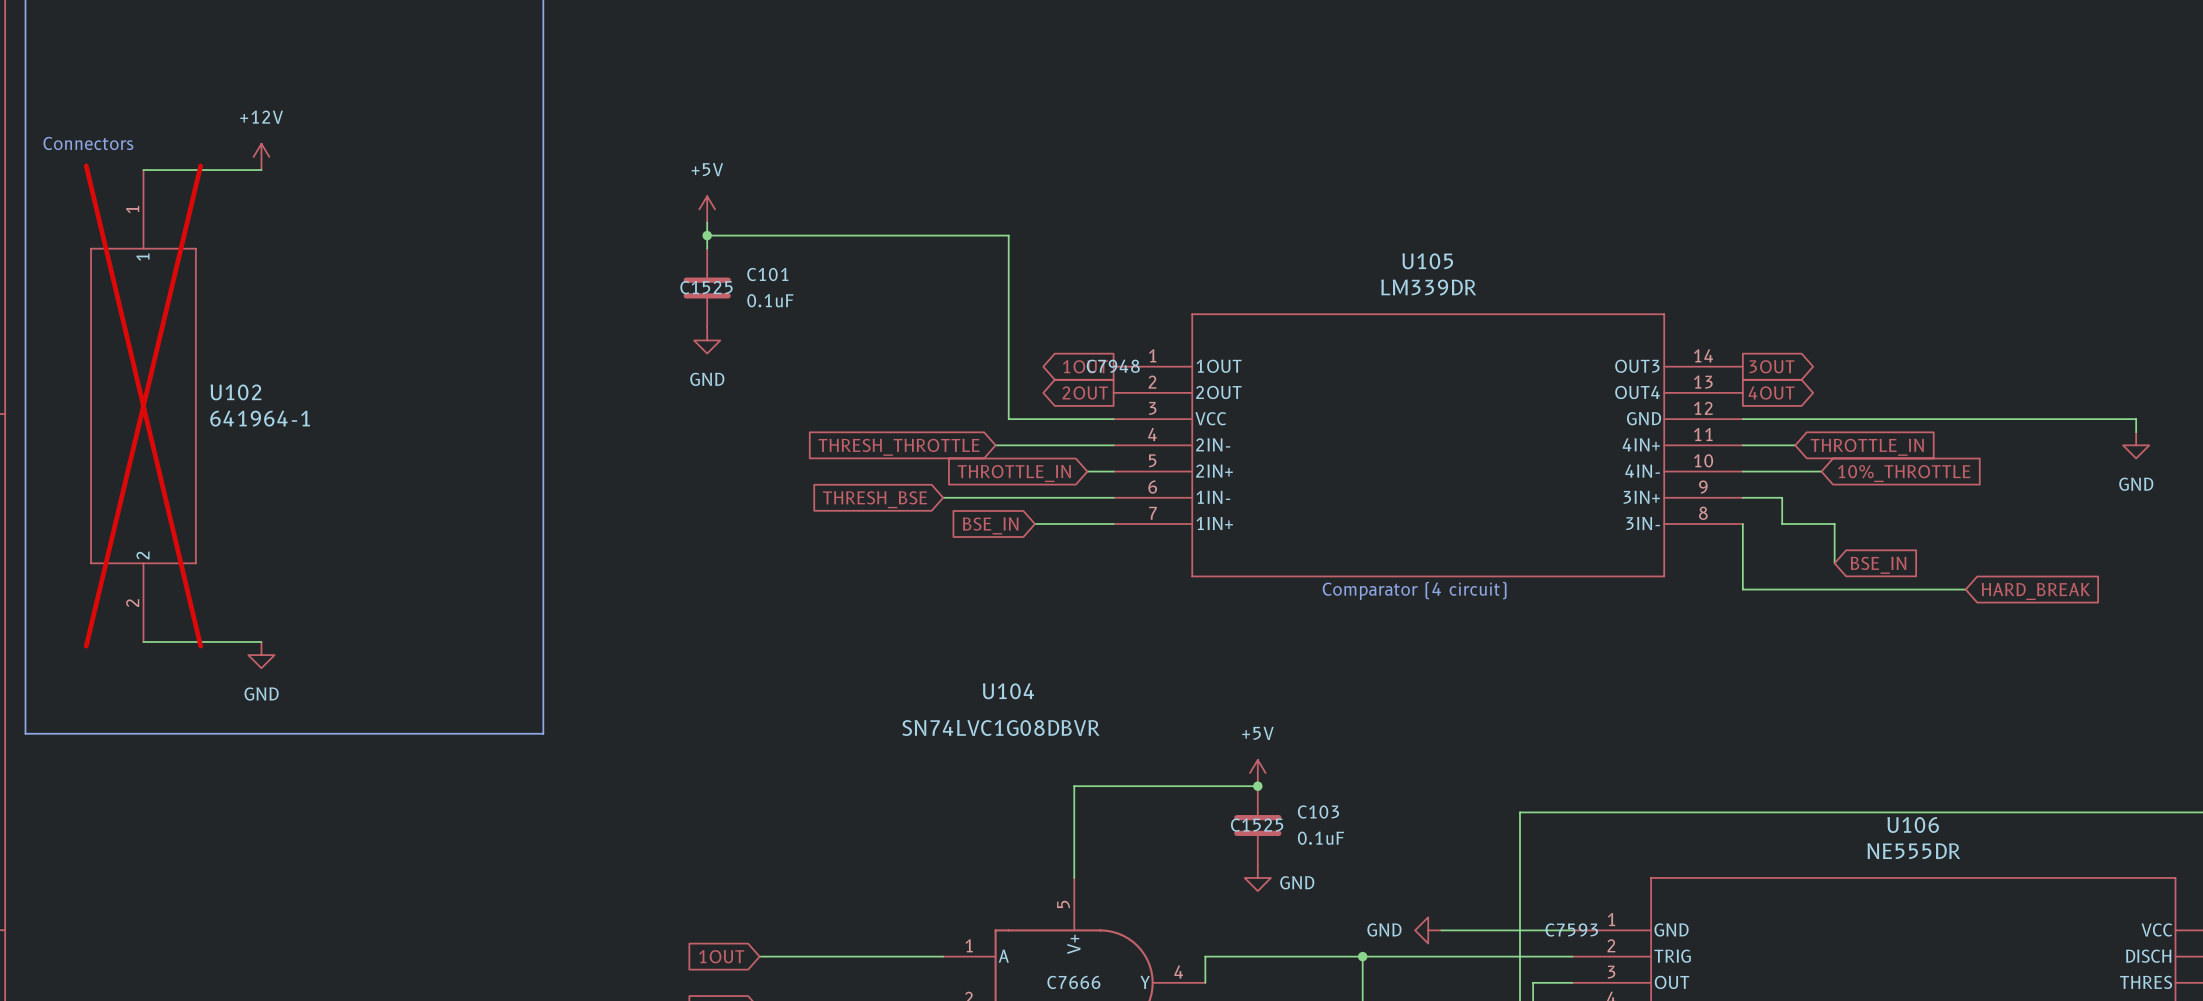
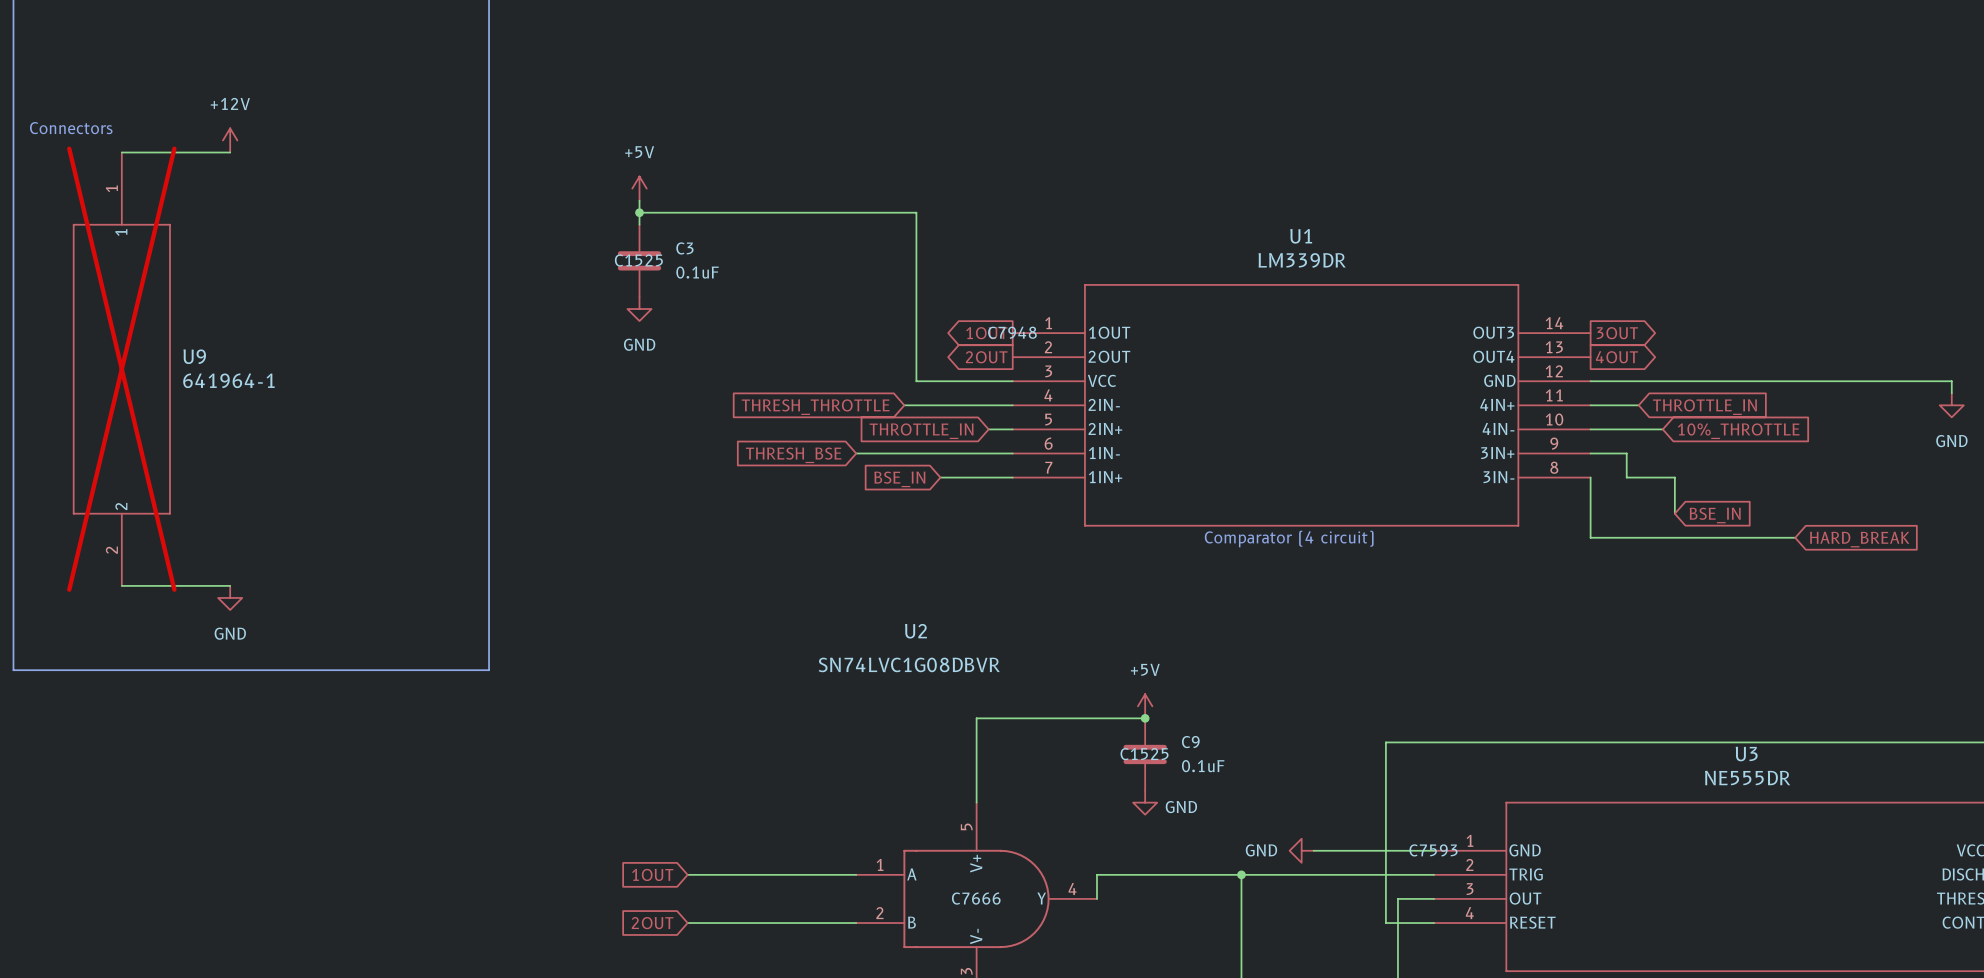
U105 name: U105 (1427, 261) -> U1 (1301, 236)
C101 name: C101 (767, 274) -> C3 (684, 248)
U102 name: U102 (235, 392) -> U9 (194, 356)
U104 name: U104 (1008, 691) -> U2 (915, 631)
C103 name: C103 (1318, 811) -> C9 (1190, 742)
U106 name: U106 (1913, 825) -> U3 (1746, 754)

